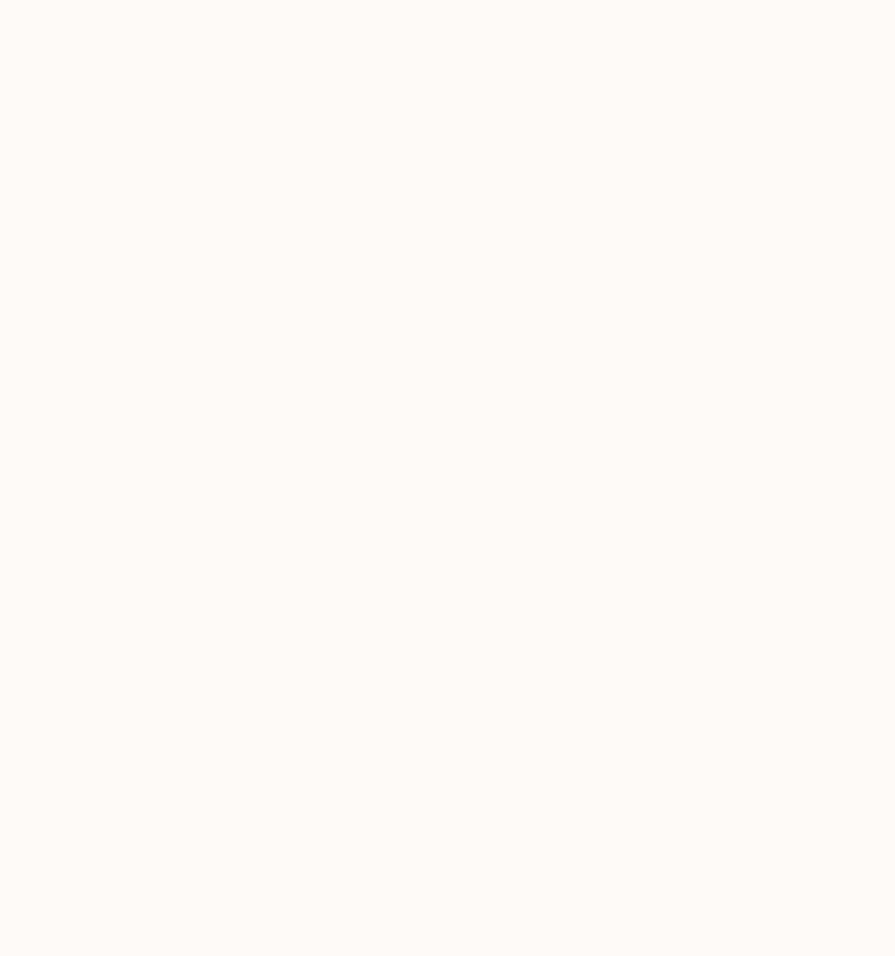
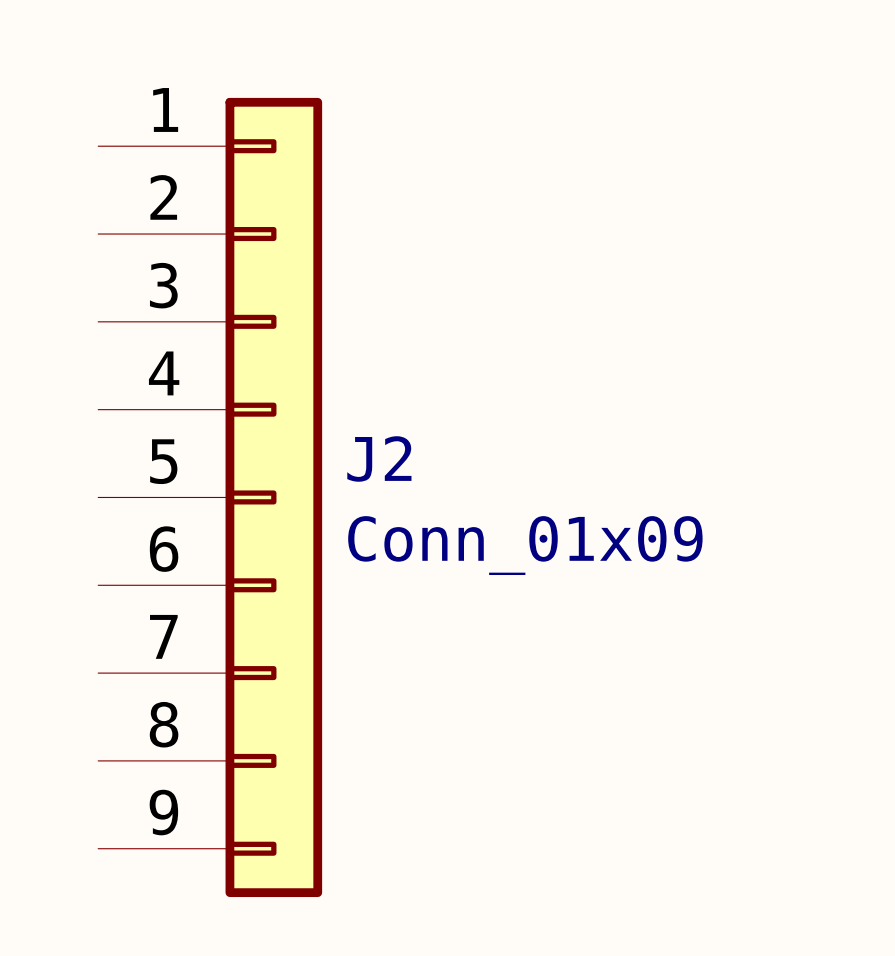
J2: none -> Conn_01x09 (210, 497)

